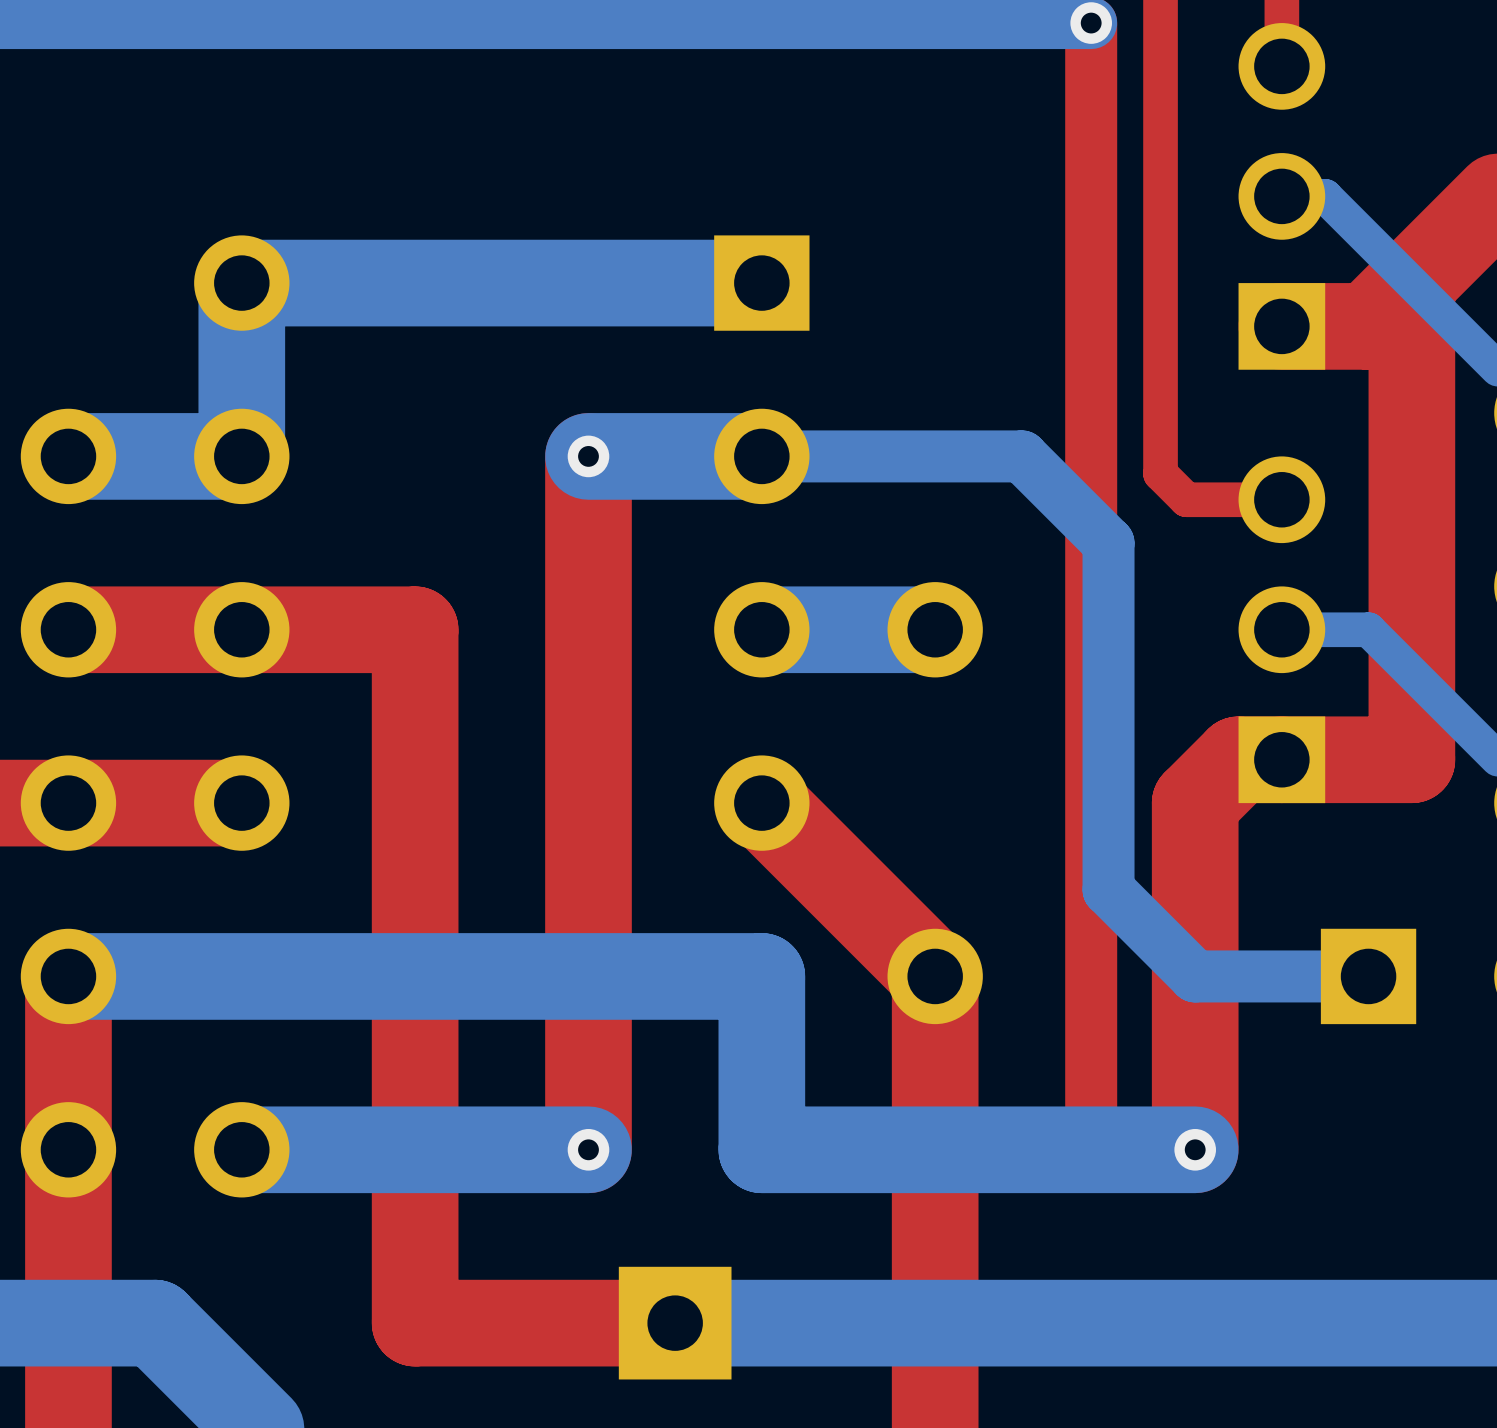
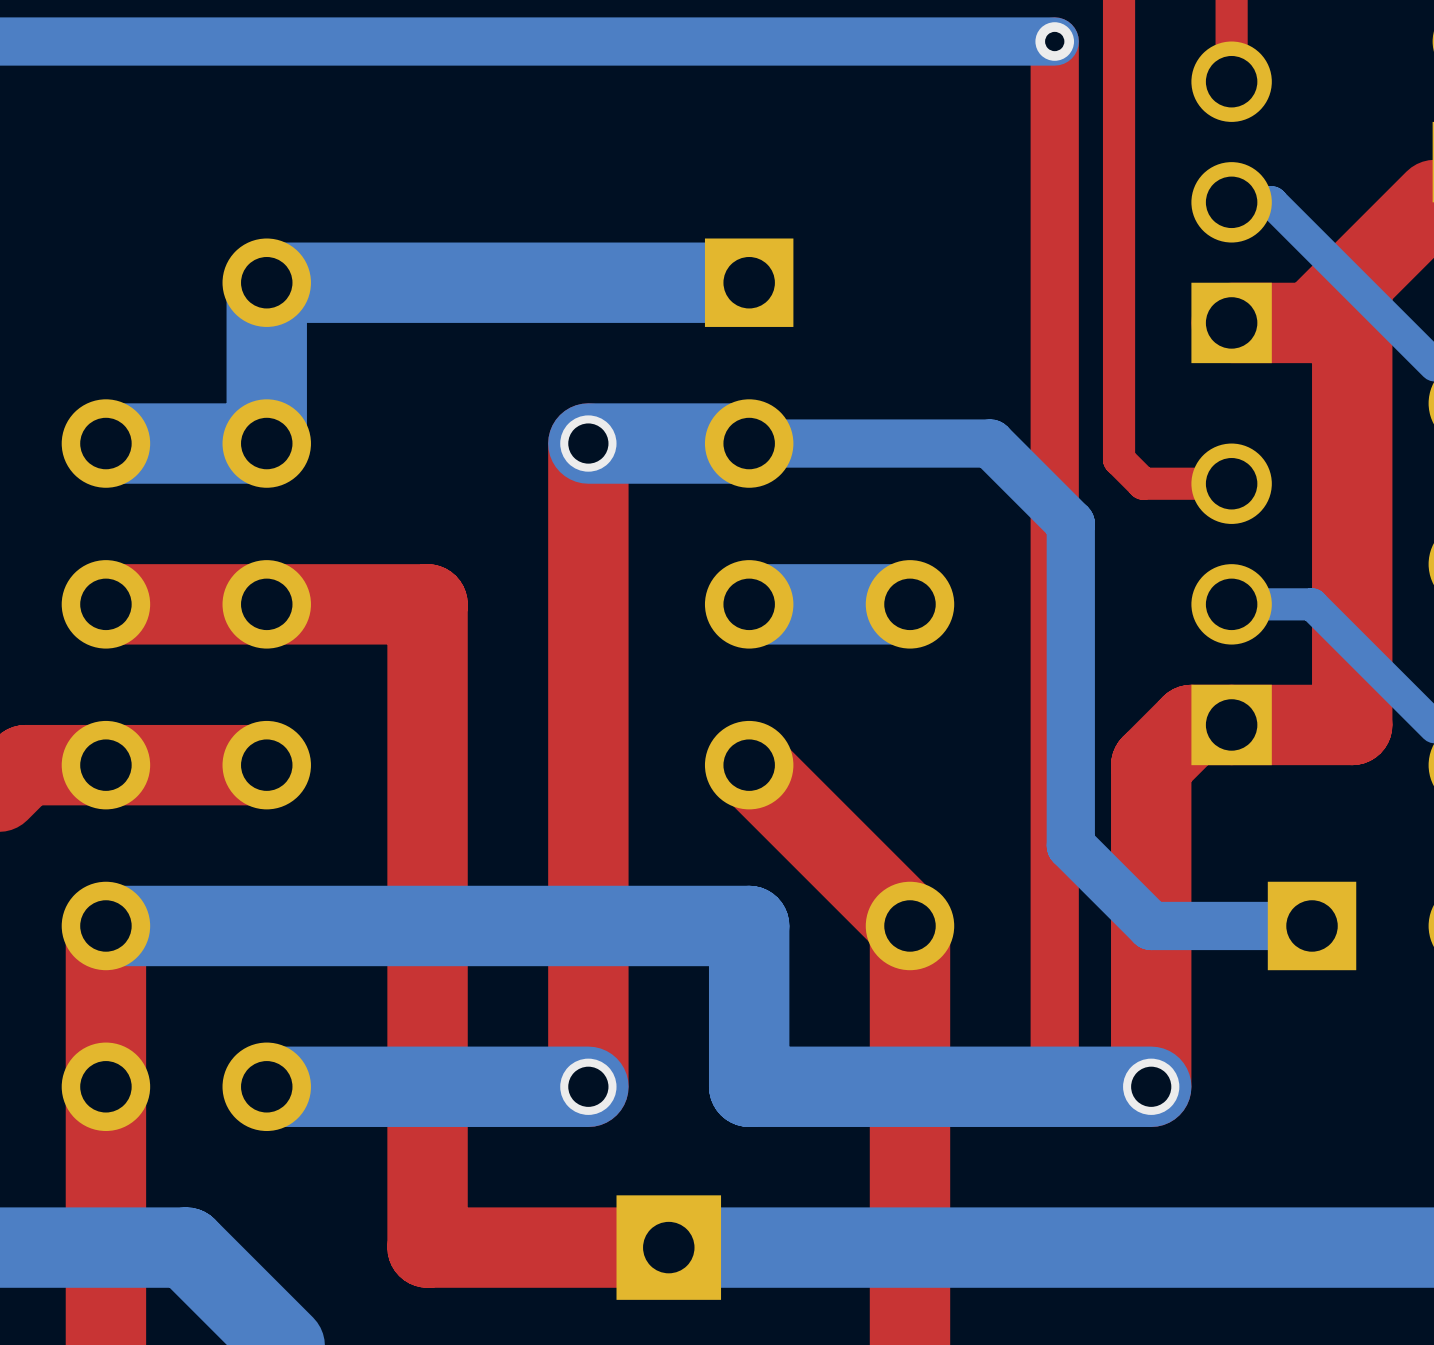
via size: [567, 435, 610, 478] -> [560, 415, 617, 472]
via size: [567, 1128, 610, 1171] -> [560, 1058, 617, 1115]
via size: [1174, 1128, 1217, 1171] -> [1123, 1058, 1180, 1115]

